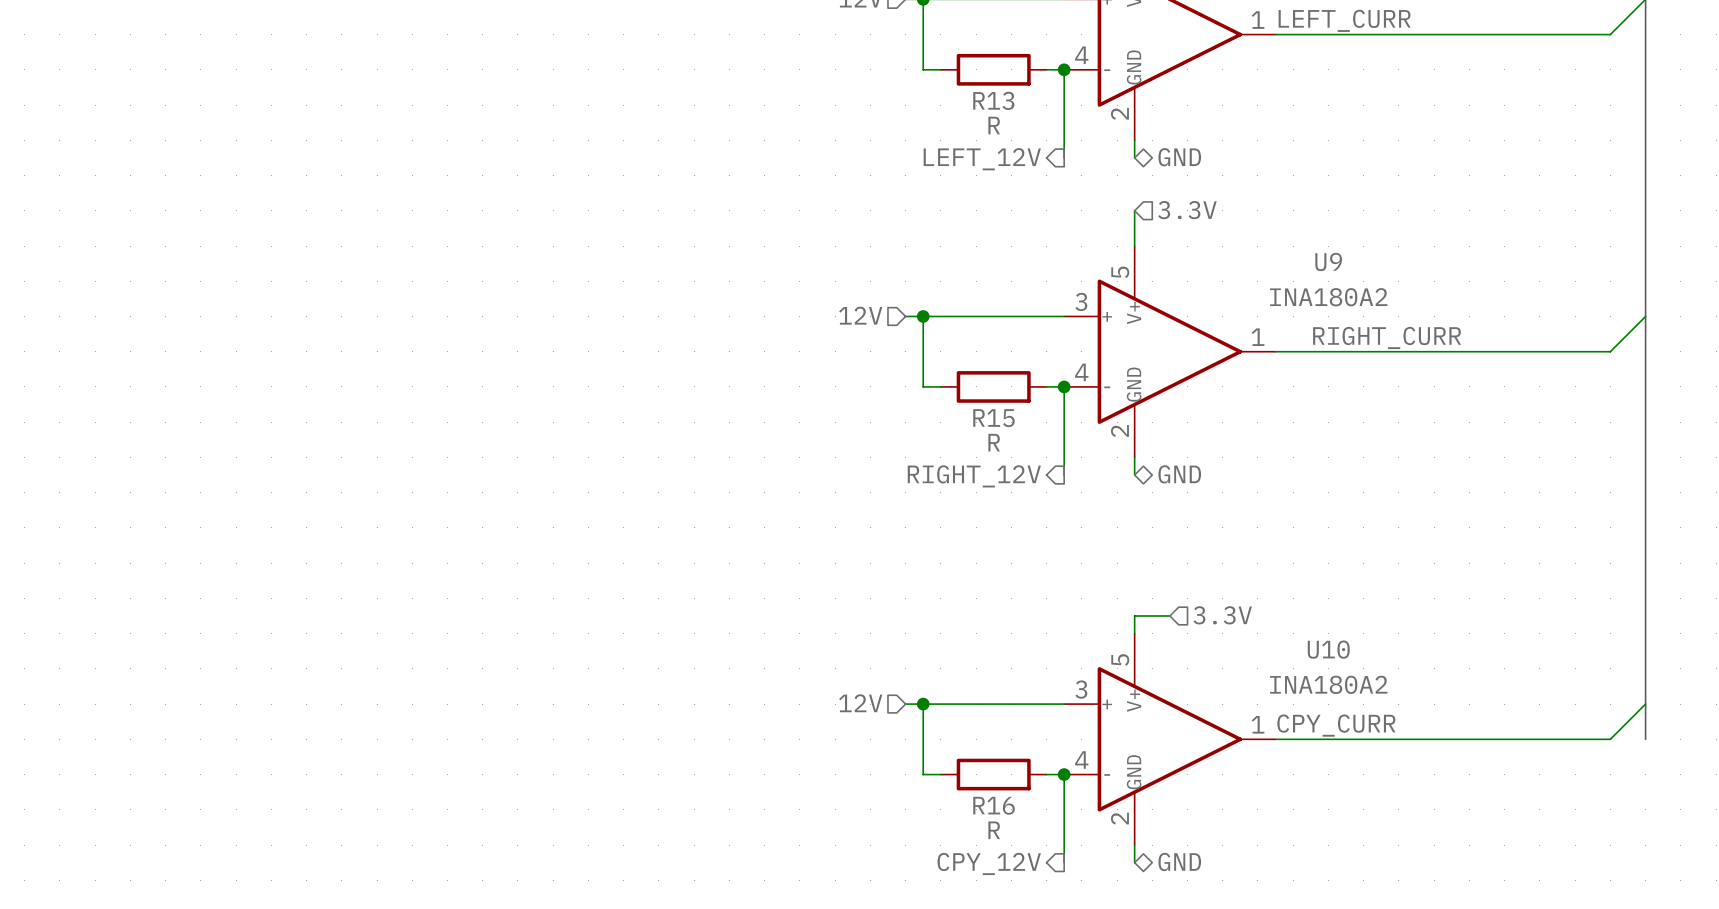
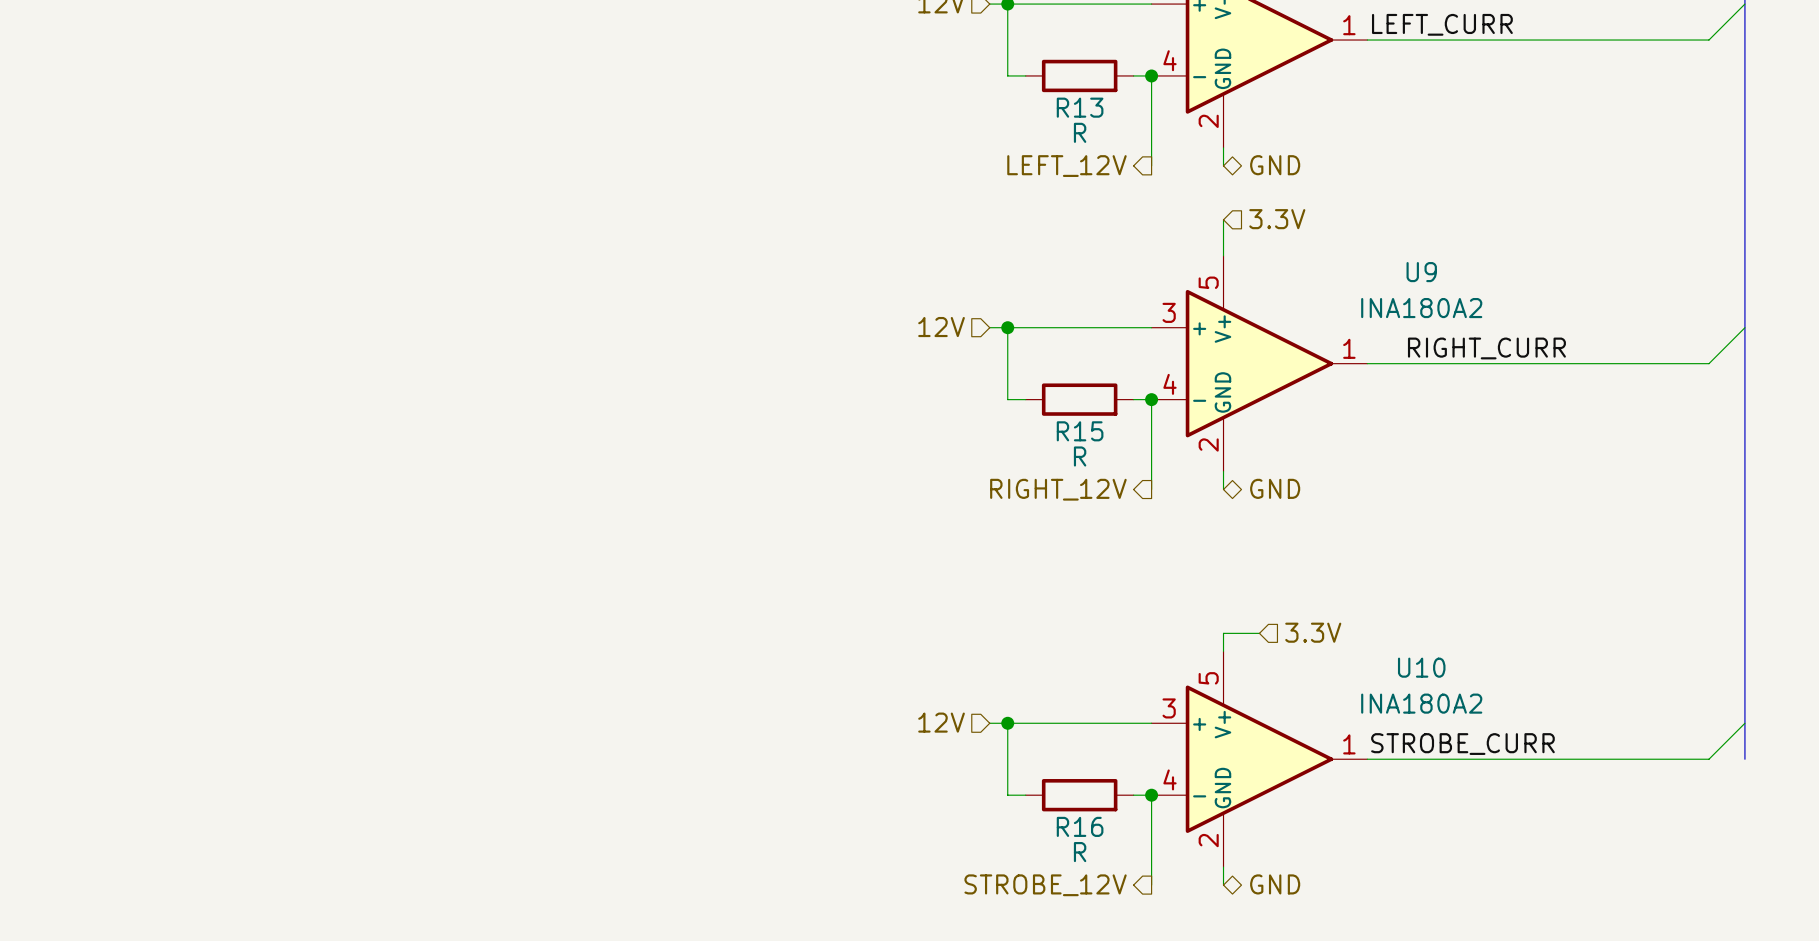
label: CPY_CURR (1336, 725) -> STROBE_CURR (1462, 744)
hierarchical label: CPY_12V (989, 863) -> STROBE_12V (1045, 885)

